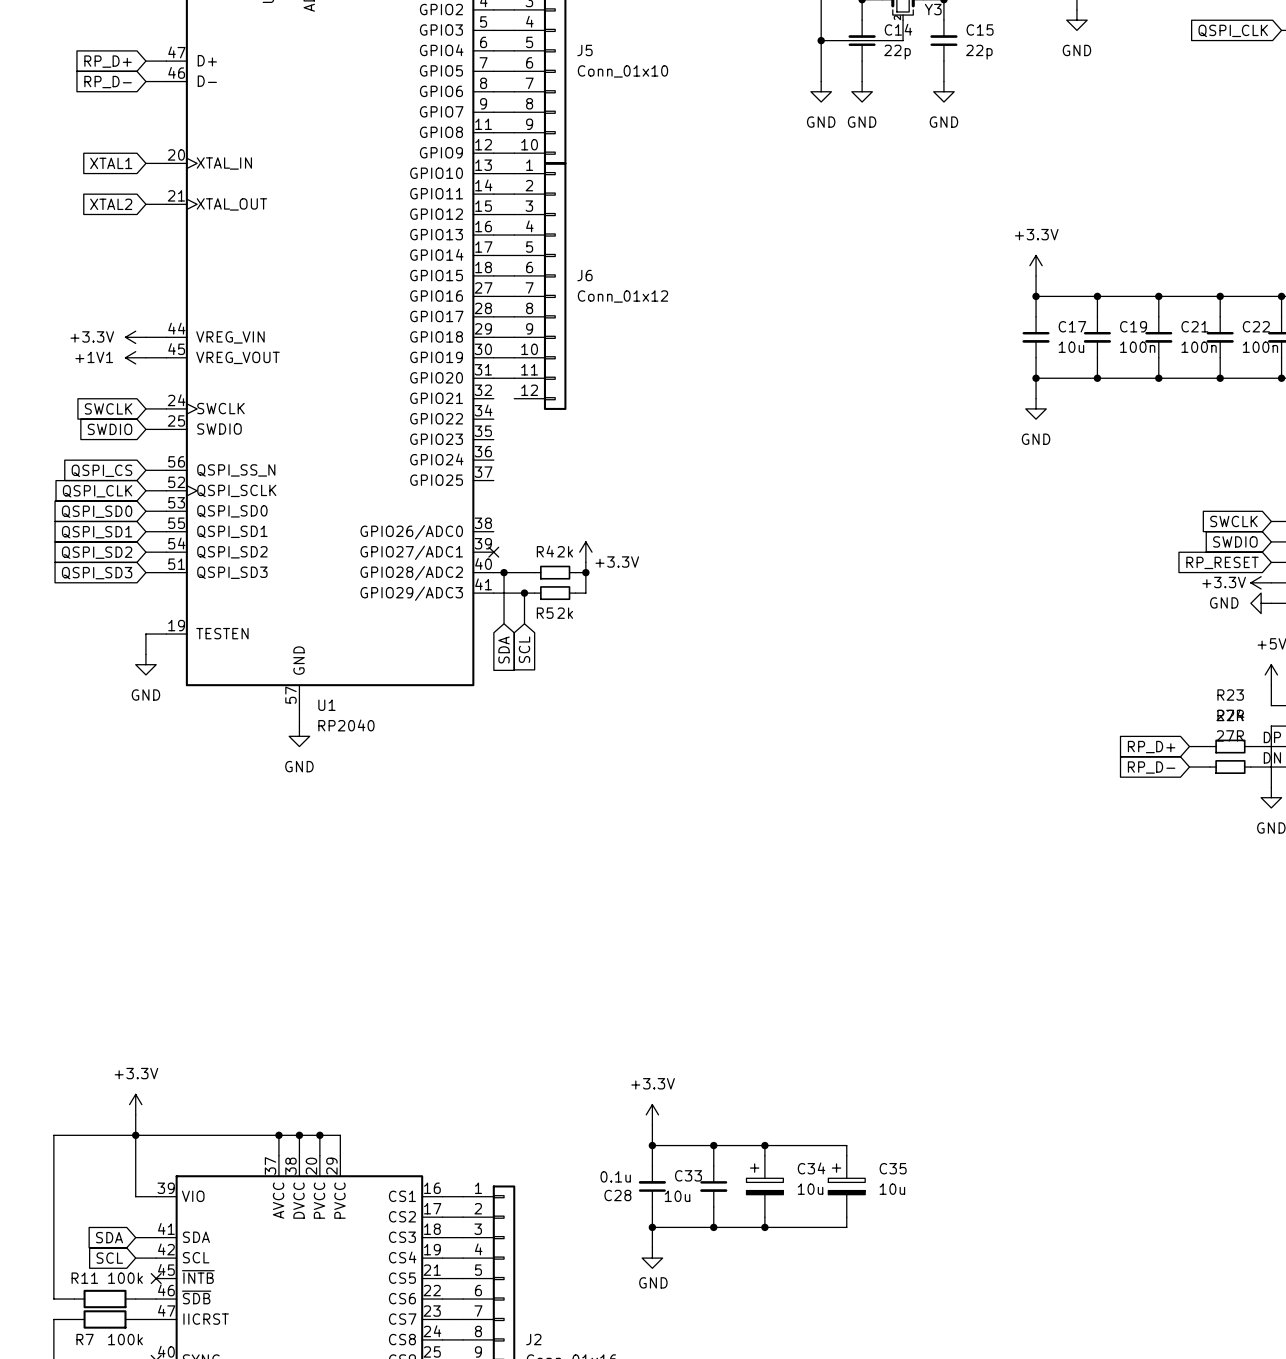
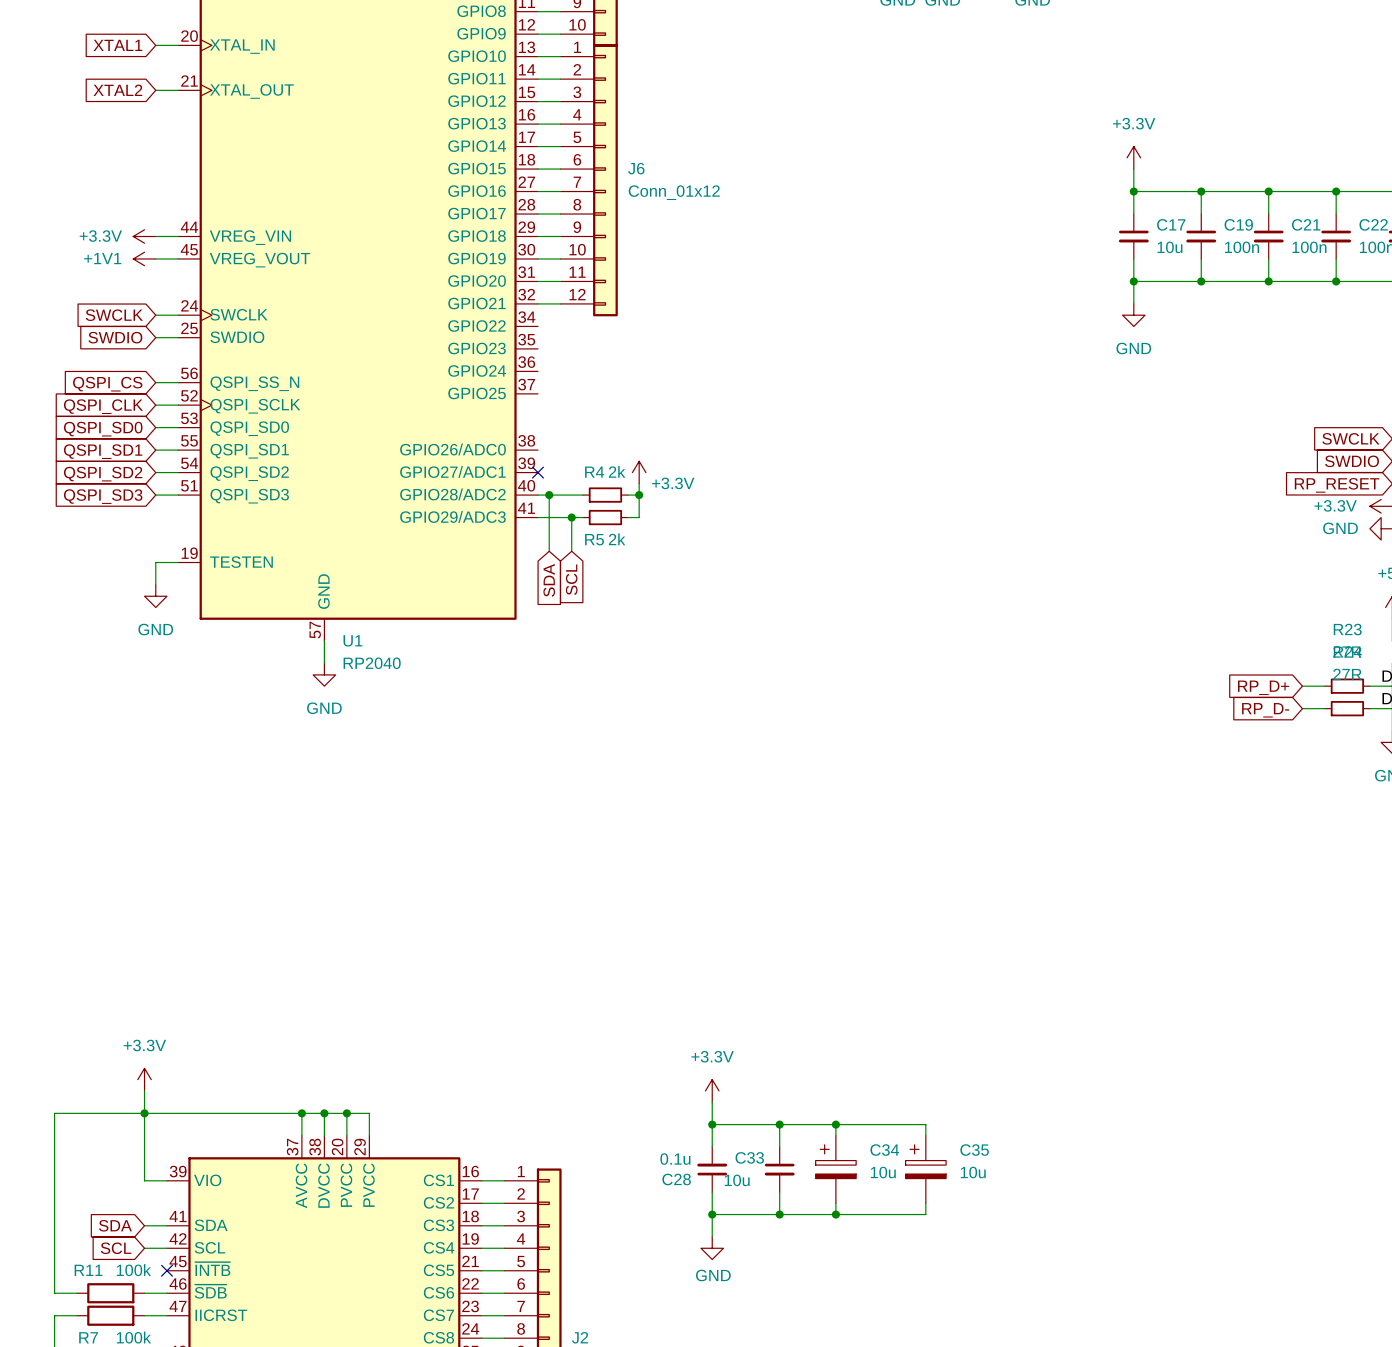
wire: none -> (537, 303) (560, 303)

